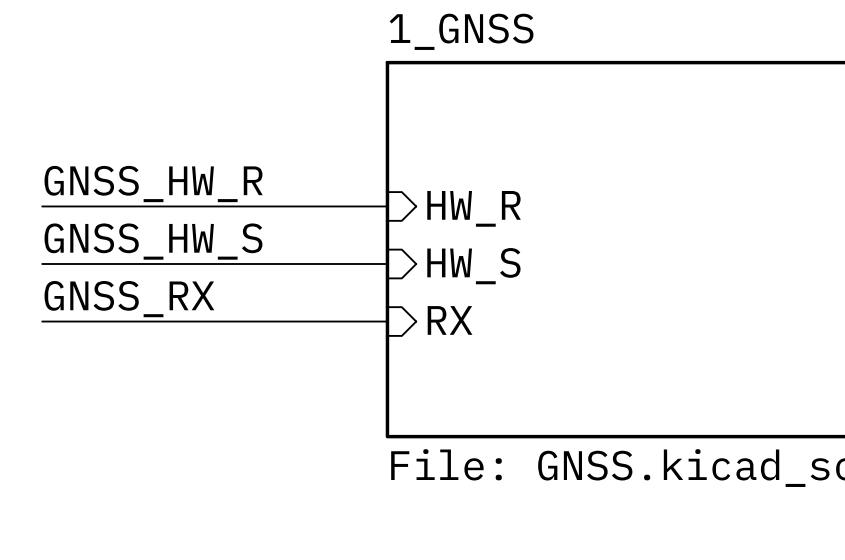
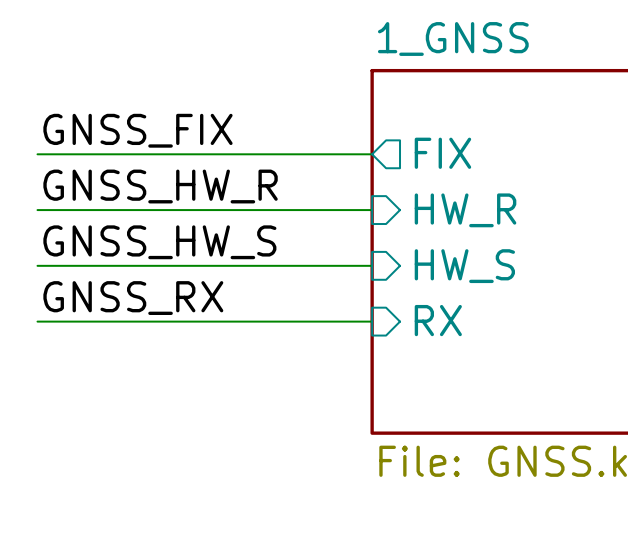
label: none -> GNSS_FIX (137, 130)
sheet pin: none -> FIX (442, 153)
wire: none -> (37, 154) (372, 154)

